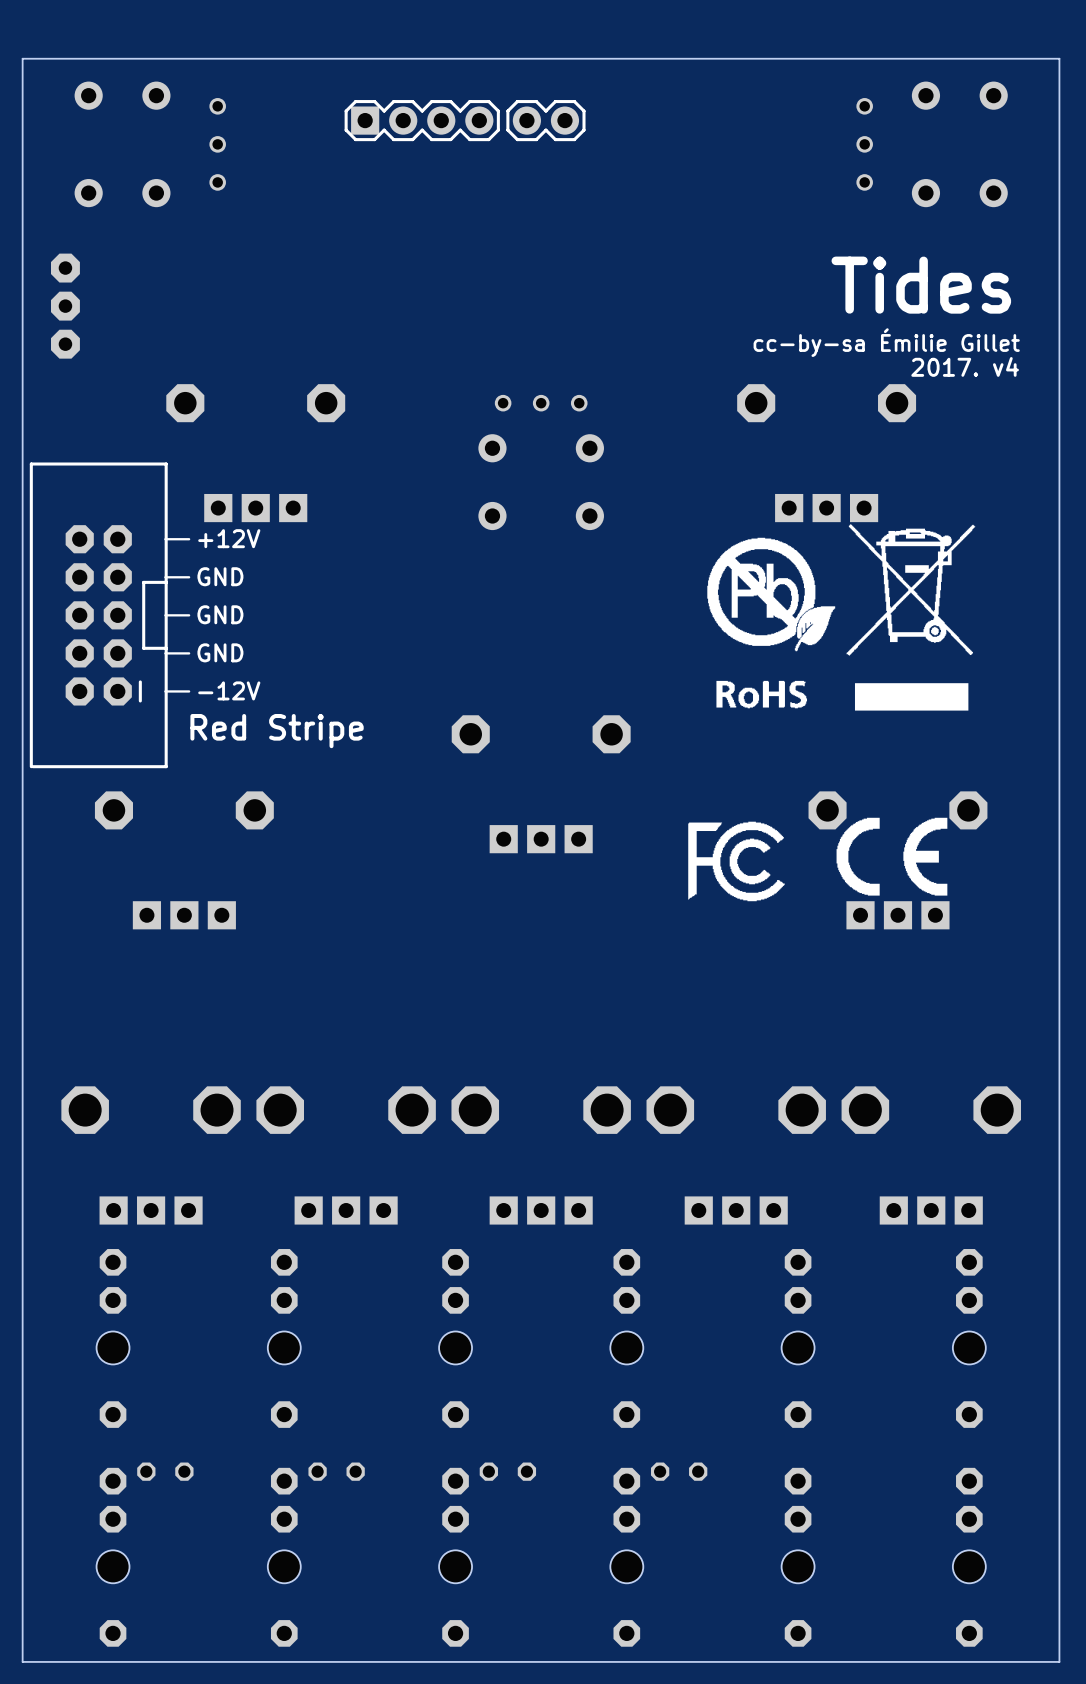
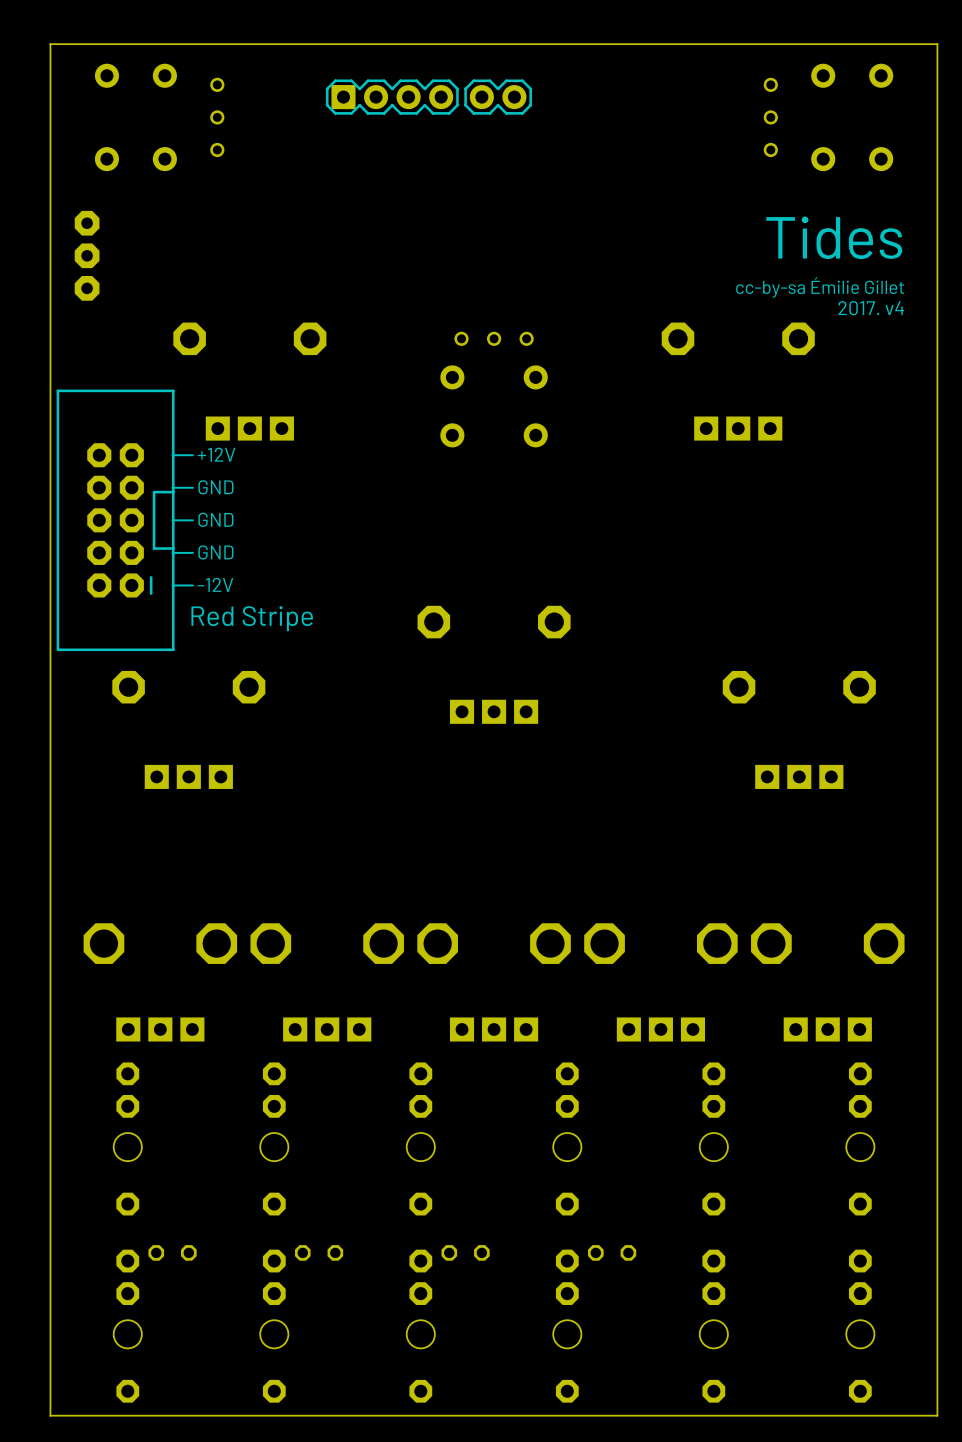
drawing: [707, 524, 976, 711] -> none
drawing: [836, 817, 948, 896] -> none
drawing: [688, 821, 785, 902] -> none

